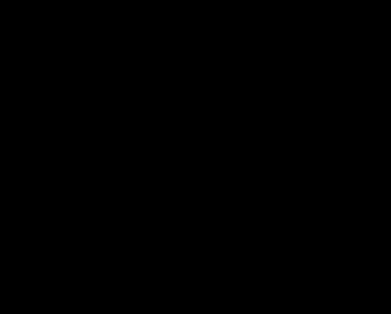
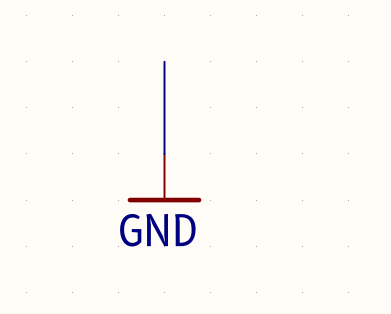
wire: none -> (164, 61) (164, 153)
power symbol: none -> GND (164, 178)

